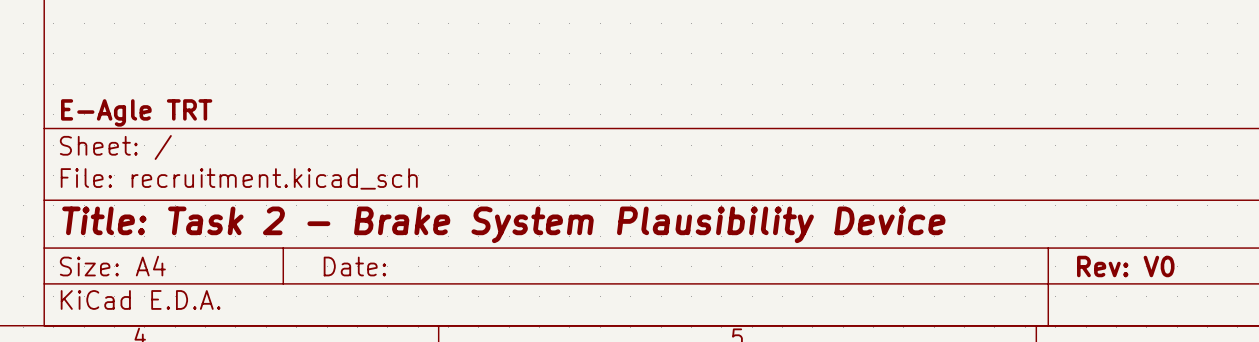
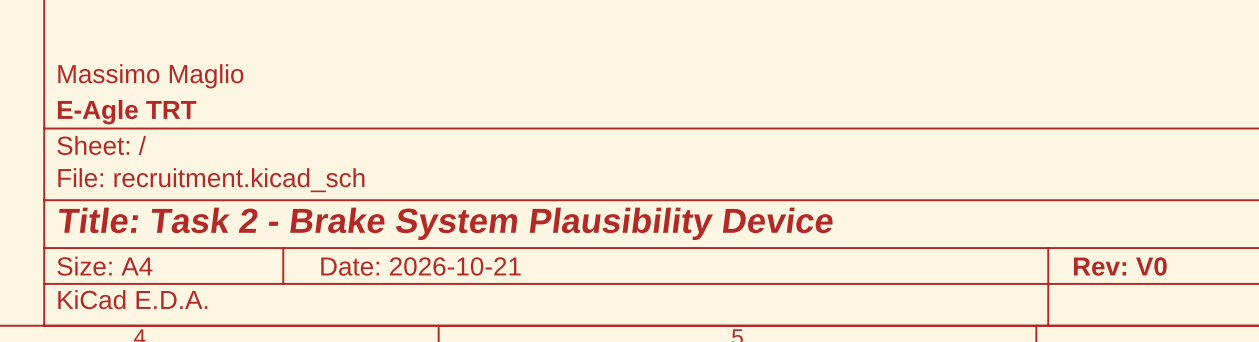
title block: none -> Massimo Maglio (150, 76)
title block: Date: (354, 266) -> Date: 2026-10-21 (420, 266)

